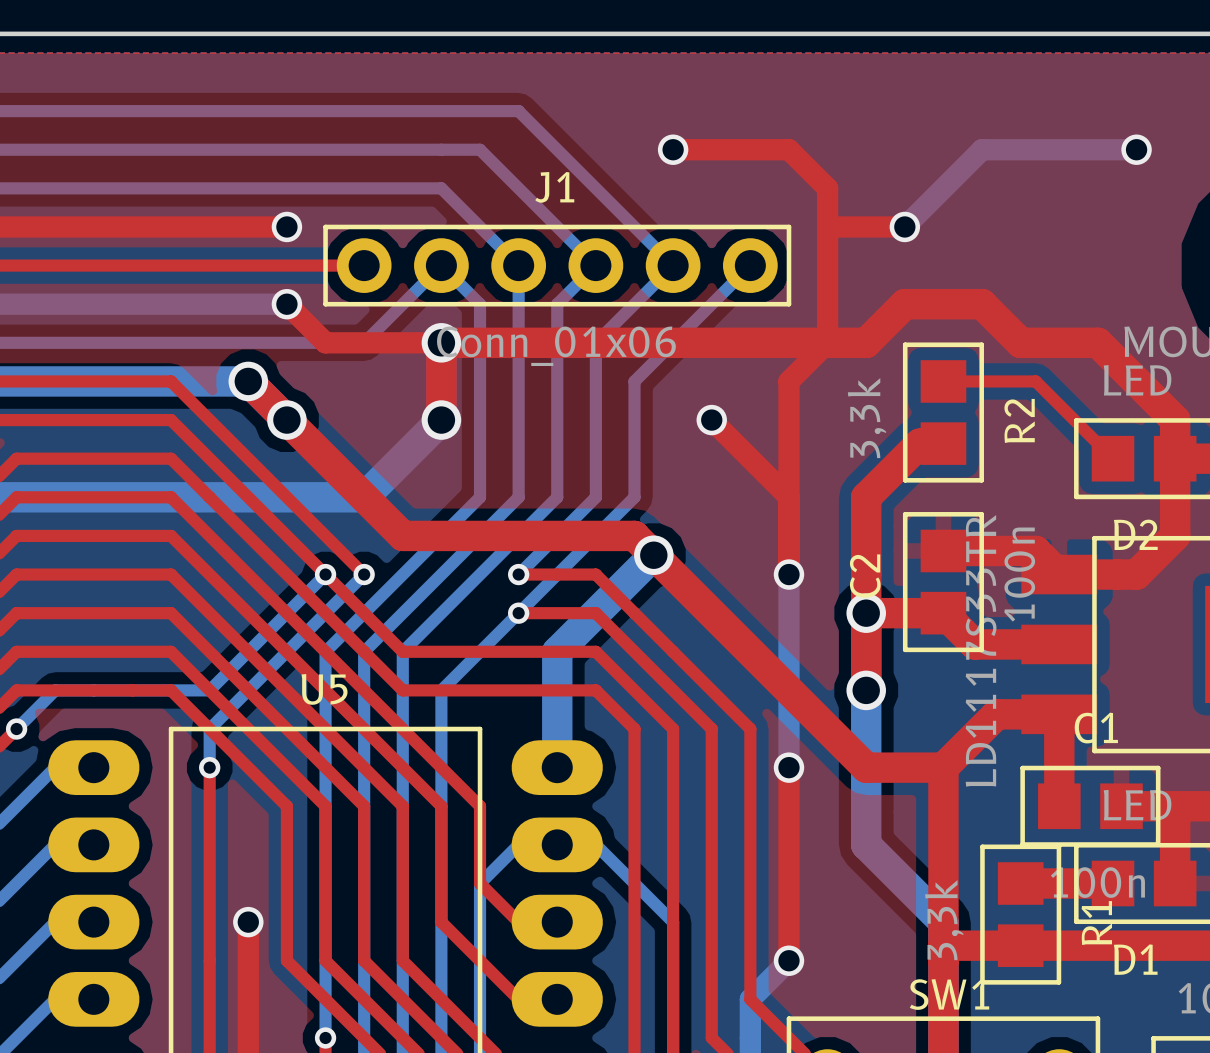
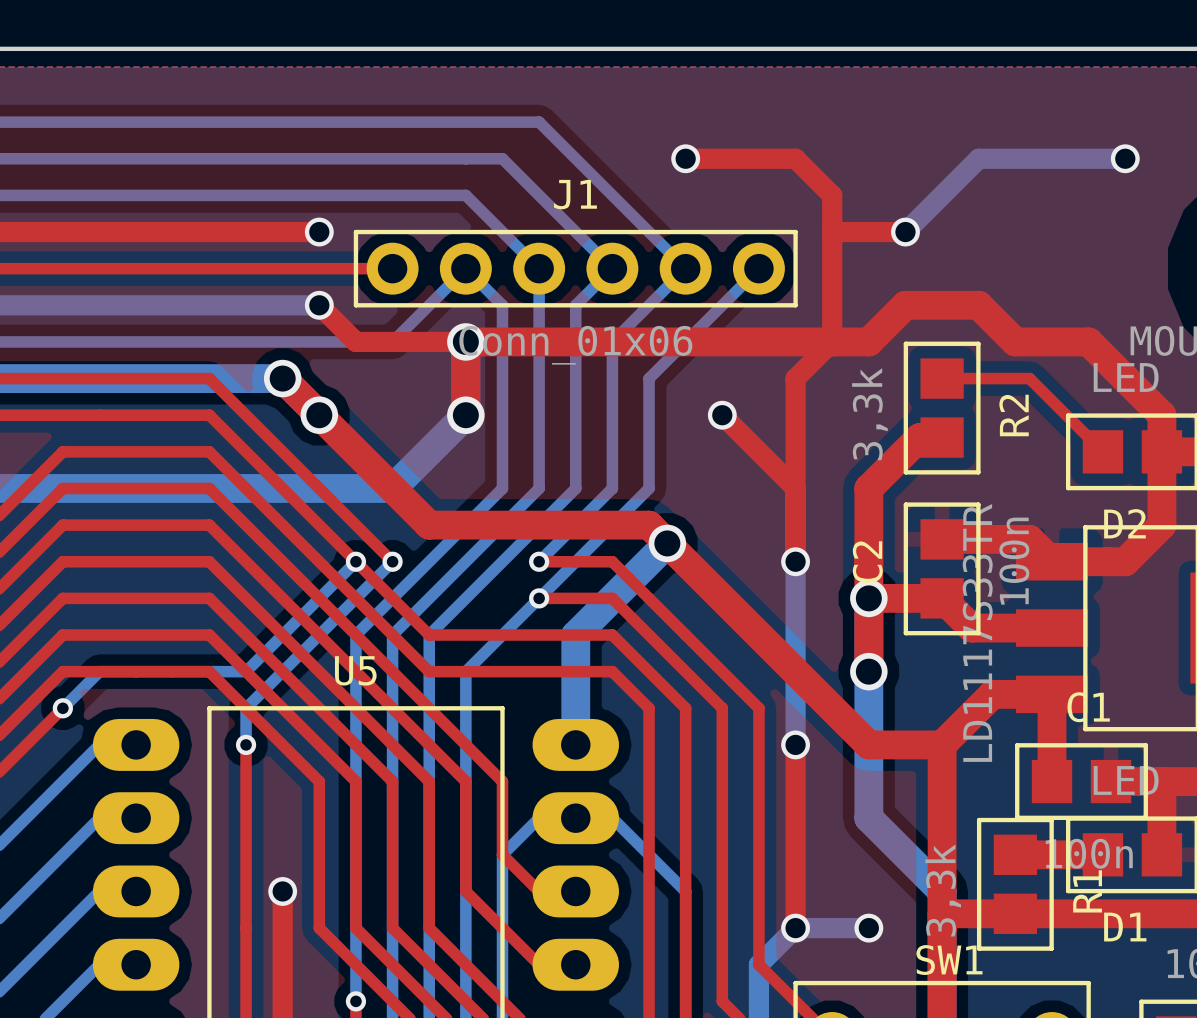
bottom track: none -> (795, 928) (868, 928)
via: none -> (868, 928)

